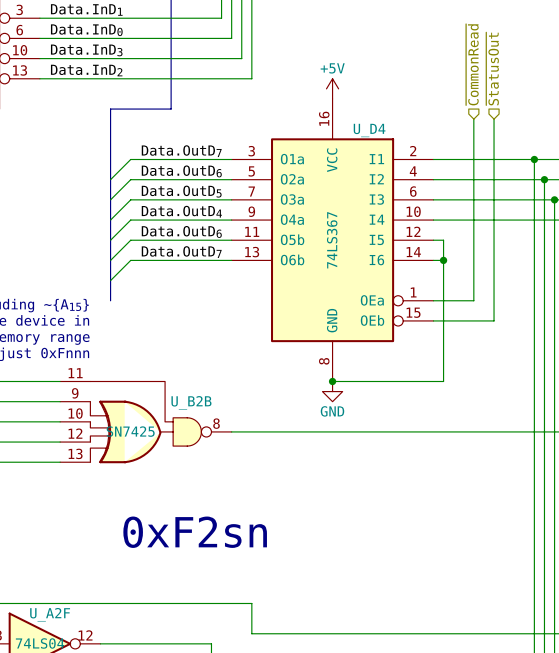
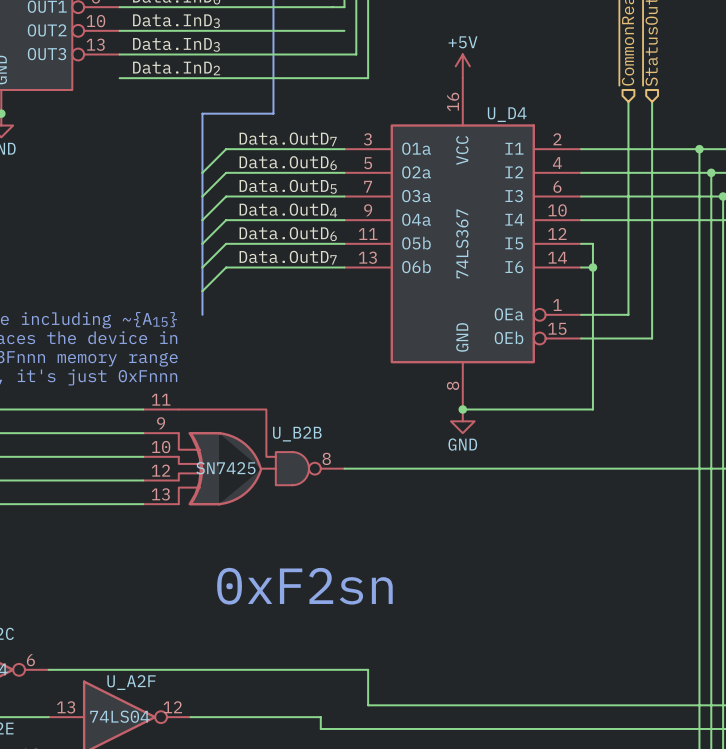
wire: (231, 58) (241, 58) -> (356, 54) (356, 30)
label: Data.InD2 (86, 70) -> Data.InD3 (176, 44)
wire: (241, 78) (251, 78) -> (119, 78) (368, 78) (368, 54)
label: none -> Data.InD2 (176, 68)
bus: (171, 109) (110, 109) (110, 129) -> (273, 90) (273, 113) (202, 113)

